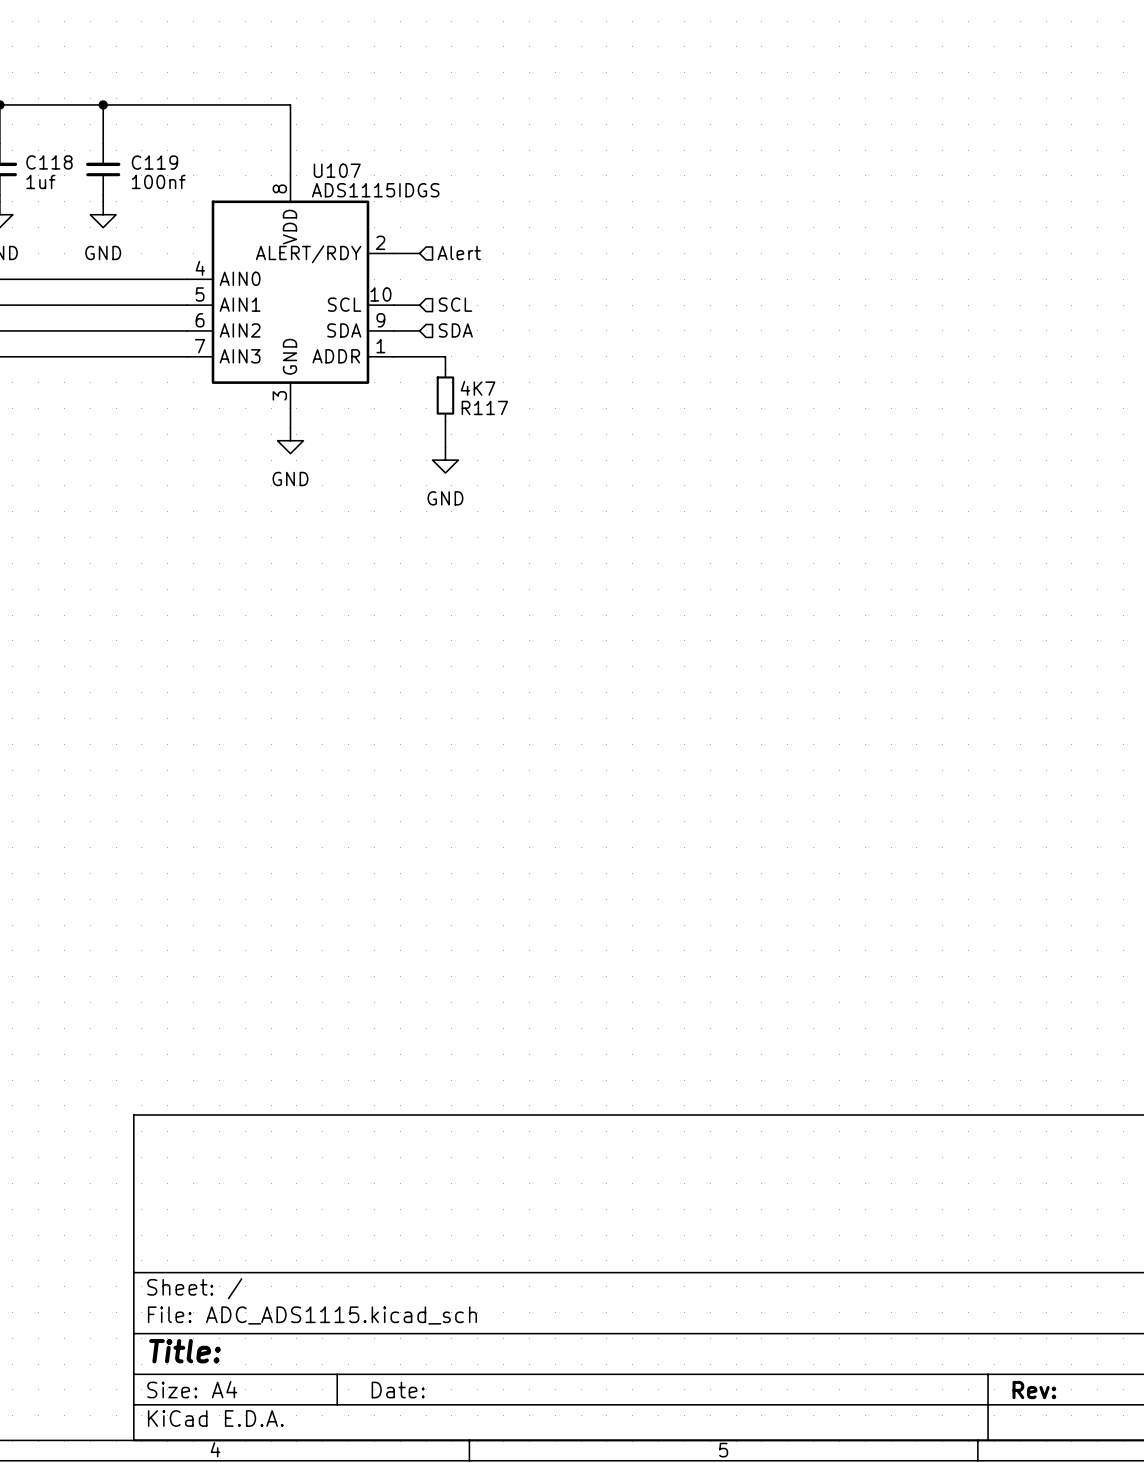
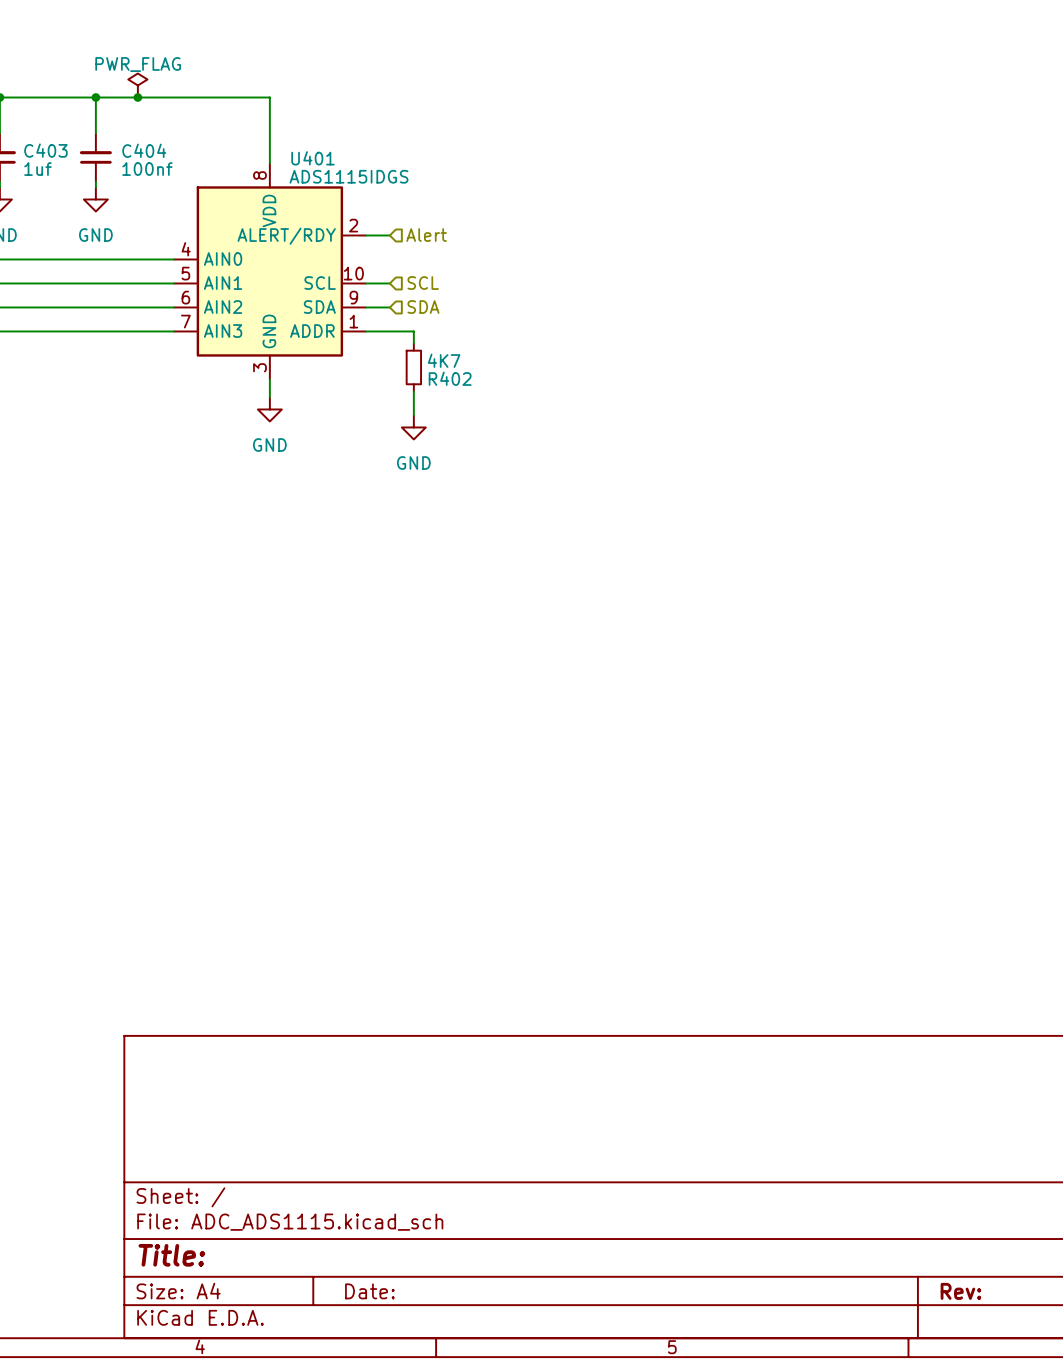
power symbol: none -> PWR_FLAG (137, 85)
junction: none -> (137, 97)
C118 name: C118 (49, 162) -> C403 (45, 150)
C119 name: C119 (154, 162) -> C404 (144, 150)
U107 name: U107 (337, 170) -> U401 (313, 158)
R117 name: R117 (484, 407) -> R402 (450, 378)

